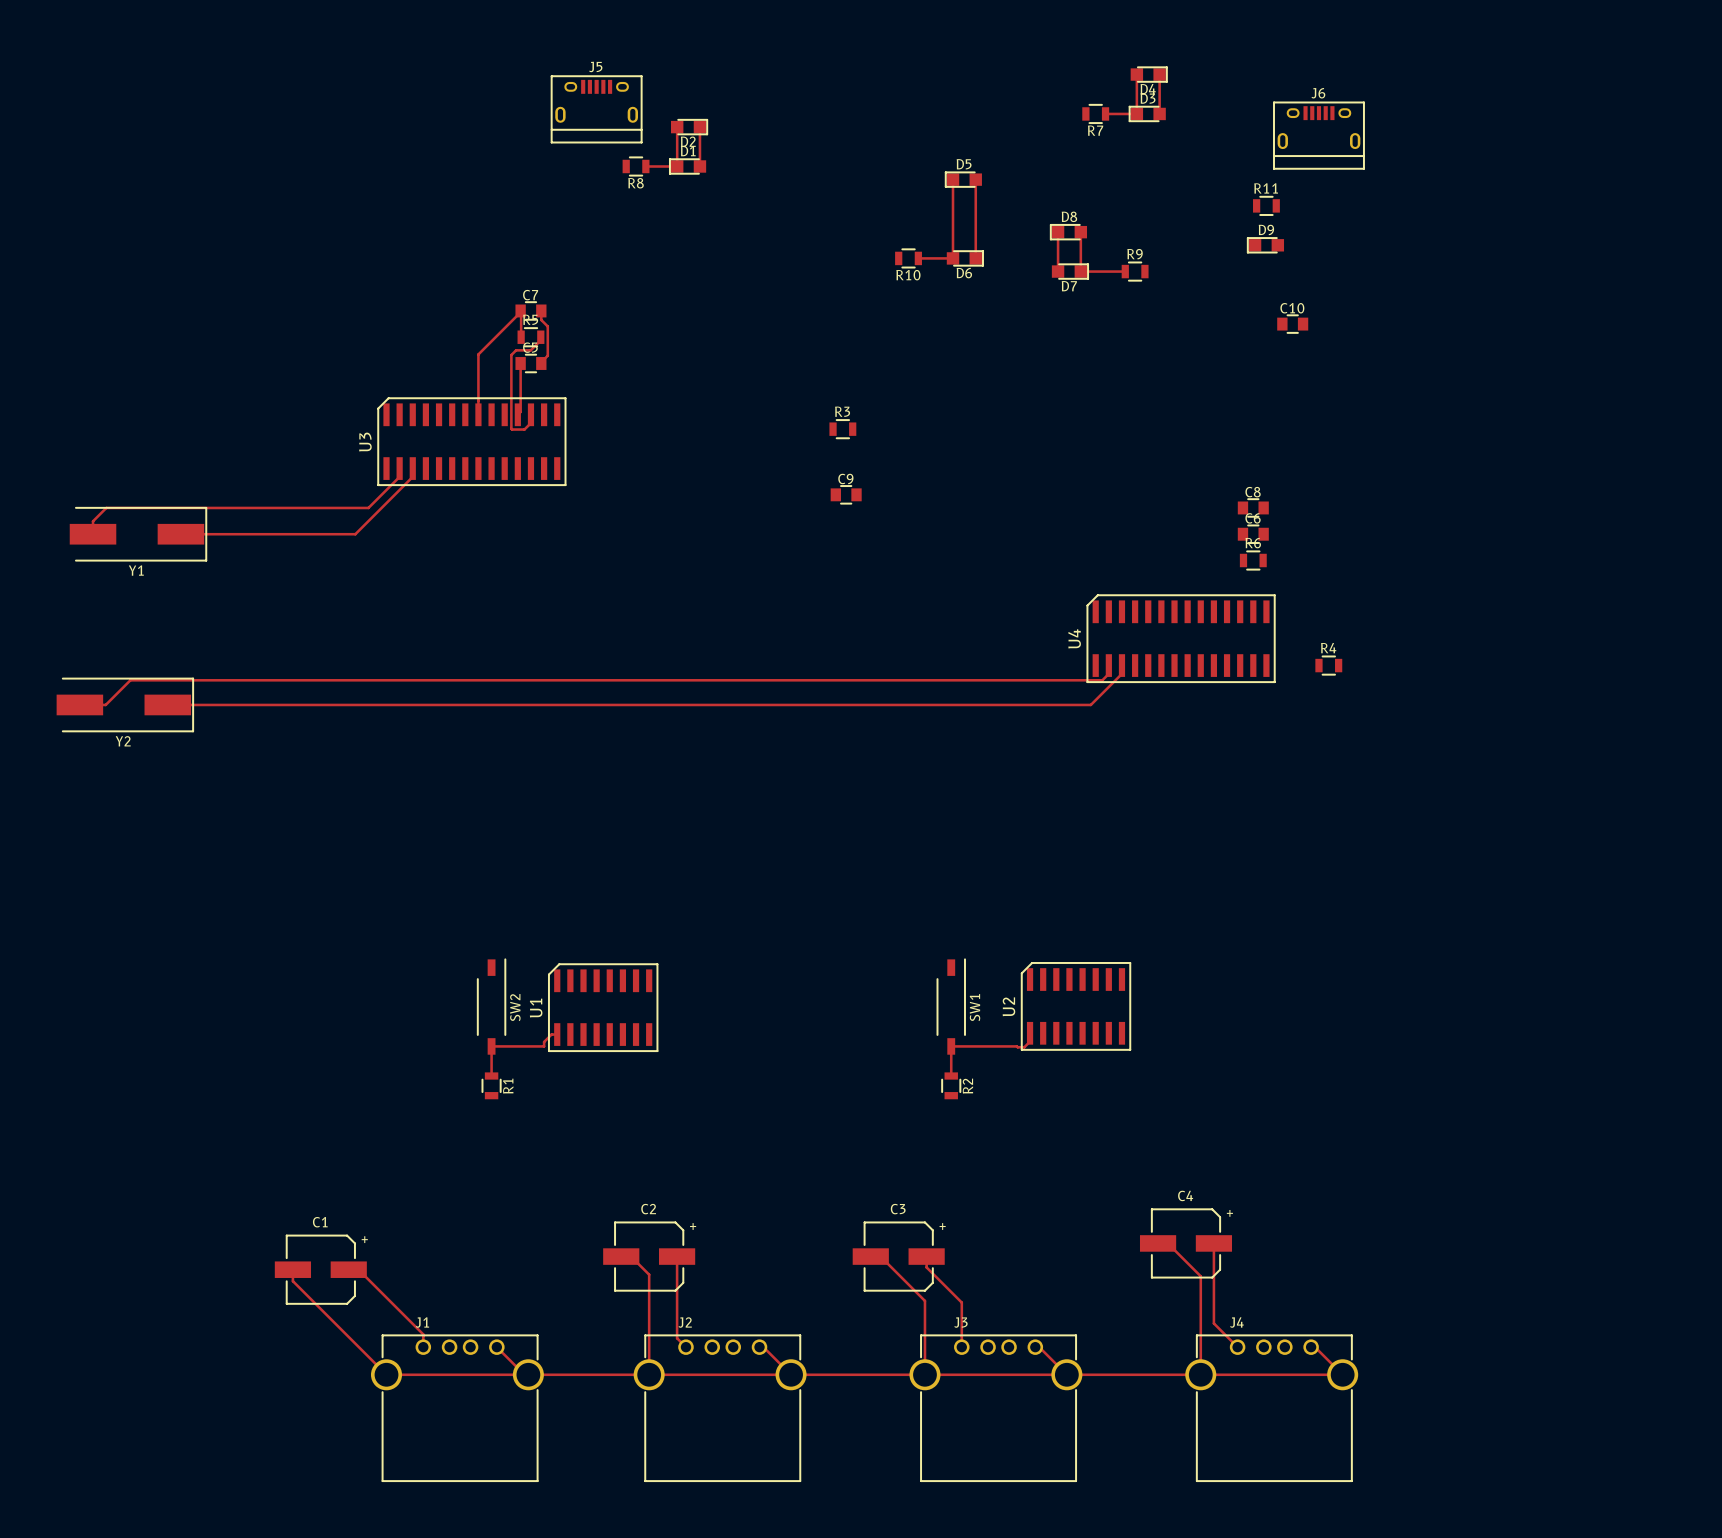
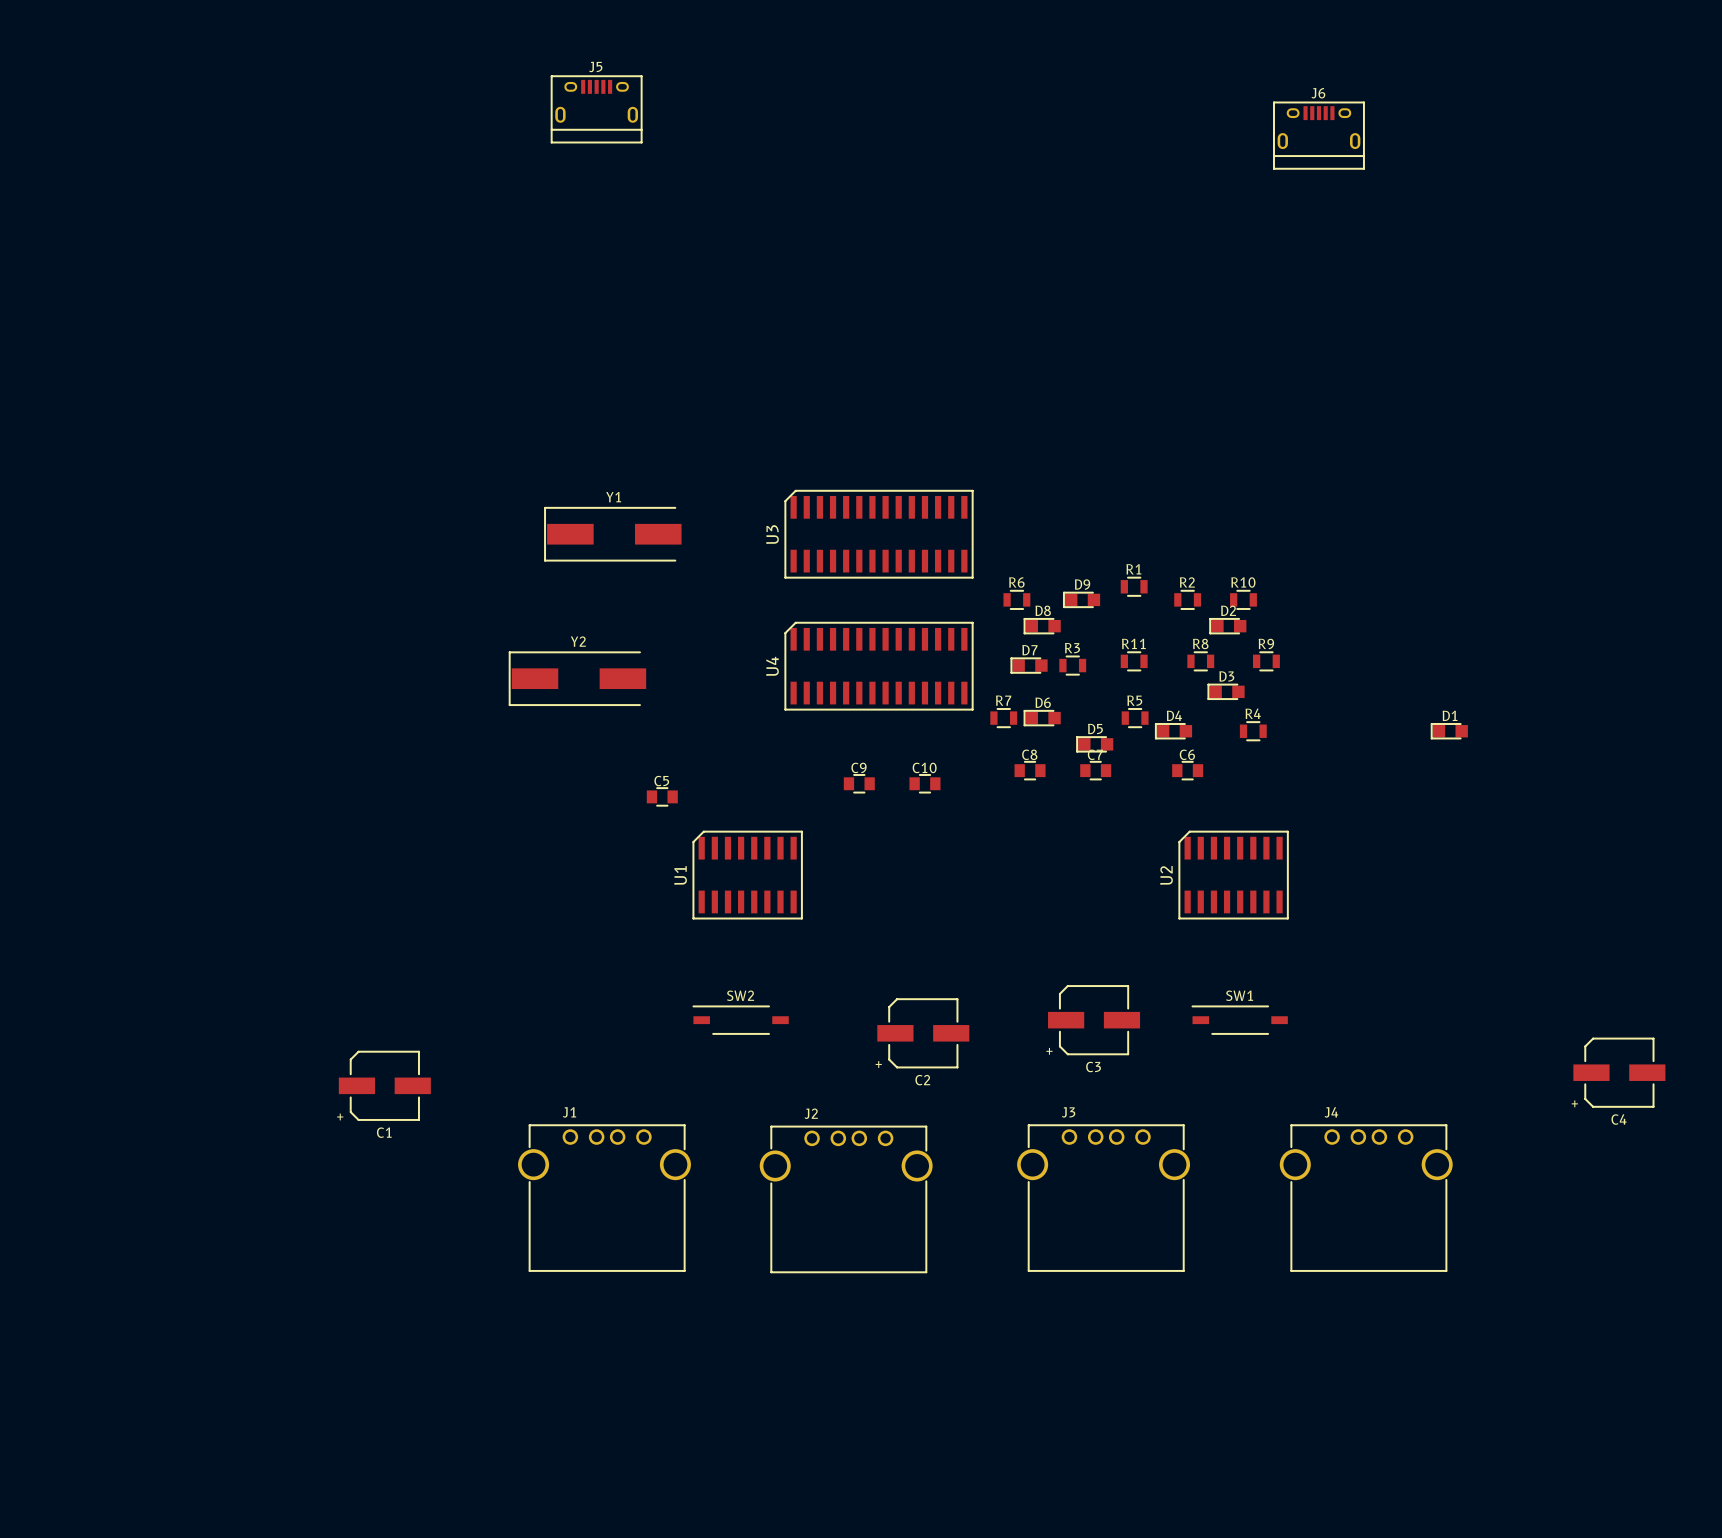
top track: (1136, 74) (1136, 113) (1105, 113) -> none
D4 rotation: 0° (1149, 74) -> 180° (1173, 731)
D4 position: (1149, 74) -> (1173, 731)
top track: (1159, 74) (1159, 113) -> none
R7 position: (1095, 113) -> (1003, 718)
D3 position: (1147, 113) -> (1226, 691)
top track: (677, 127) (677, 166) (645, 166) -> none
D2 rotation: 0° (689, 127) -> 180° (1227, 626)
D2 position: (689, 127) -> (1227, 626)
top track: (699, 127) (699, 166) -> none
R7 name position: R7 (1095, 130) -> R7 (1003, 700)
R8 position: (636, 166) -> (1200, 661)
D1 position: (687, 166) -> (1449, 731)
top track: (953, 179) (953, 258) (918, 258) -> none
D5 position: (963, 179) -> (1094, 744)
top track: (975, 179) (975, 258) -> none
R8 name position: R8 (635, 183) -> R8 (1200, 643)
R11 position: (1266, 205) -> (1134, 661)
top track: (1058, 232) (1058, 271) -> none
D8 position: (1068, 232) -> (1042, 626)
top track: (1080, 232) (1080, 271) (1125, 271) -> none
D9 position: (1265, 245) -> (1081, 599)
R10 position: (908, 258) -> (1243, 599)
D6 rotation: 0° (965, 258) -> 180° (1042, 718)
D6 position: (965, 258) -> (1042, 718)
D7 rotation: 0° (1070, 271) -> 180° (1029, 665)
D7 position: (1070, 271) -> (1029, 665)
R9 position: (1135, 271) -> (1266, 661)
R10 name position: R10 (908, 275) -> R10 (1243, 582)
C7 position: (530, 310) -> (1095, 770)
top track: (541, 310) (541, 320) (547, 326) (547, 355) (541, 363) -> none
C10 position: (1292, 324) -> (924, 783)
top track: (521, 337) (520, 310) (478, 354) (478, 414) -> none
R5 position: (530, 337) -> (1135, 718)
top track: (540, 337) (540, 340) (530, 350) (516, 350) (511, 355) (511, 428) (524, 429) (530, 423) (530, 414) -> none
top track: (520, 363) (520, 411) (517, 414) -> none
C5 position: (530, 363) -> (662, 796)
R3 position: (842, 429) -> (1072, 665)
U3 position: (471, 441) -> (879, 534)
top track: (399, 468) (399, 476) (368, 507) (106, 507) (93, 521) (93, 534) -> none
top track: (412, 468) (412, 476) (355, 534) (180, 534) -> none
C9 position: (846, 494) -> (859, 783)
C8 position: (1253, 507) -> (1030, 770)
Y1 rotation: 0° (138, 534) -> 180° (612, 534)
Y1 position: (138, 534) -> (612, 534)
C6 position: (1253, 534) -> (1187, 770)
R6 position: (1253, 560) -> (1016, 599)
U4 position: (1181, 638) -> (879, 666)
top track: (1108, 665) (1108, 673) (1102, 680) (130, 680) (105, 704) (79, 704) -> none
top track: (1121, 665) (1121, 673) (1090, 704) (167, 704) -> none
R4 position: (1328, 665) -> (1253, 731)
Y2 rotation: 0° (125, 704) -> 180° (577, 678)
Y2 position: (125, 704) -> (577, 678)
SW2 rotation: 0° (491, 1006) -> 90° counterclockwise (740, 1020)
SW2 position: (491, 1006) -> (740, 1020)
SW1 rotation: 0° (951, 1006) -> 90° counterclockwise (1239, 1020)
SW1 position: (951, 1006) -> (1239, 1020)
U2 position: (1076, 1006) -> (1233, 875)
U1 position: (603, 1007) -> (747, 875)
top track: (1030, 1033) (1030, 1041) (1024, 1047) (951, 1046) (951, 1076) -> none
top track: (557, 1034) (551, 1034) (544, 1041) (544, 1046) (491, 1046) (491, 1076) -> none
R1 rotation: 0° (491, 1085) -> 90° clockwise (1134, 586)
R1 position: (491, 1085) -> (1134, 586)
R2 rotation: 0° (951, 1085) -> 90° clockwise (1187, 599)
R2 position: (951, 1085) -> (1187, 599)
R1 name position: R1 (508, 1086) -> R1 (1133, 569)
R2 name position: R2 (967, 1086) -> R2 (1187, 582)
top track: (1158, 1243) (1167, 1243) (1200, 1276) (1200, 1374) -> none
C4 rotation: 0° (1185, 1243) -> 180° (1619, 1072)
C4 position: (1185, 1243) -> (1619, 1072)
top track: (1213, 1243) (1213, 1323) (1237, 1347) -> none
top track: (621, 1256) (631, 1256) (649, 1274) (649, 1374) -> none
C2 rotation: 0° (649, 1256) -> 180° (923, 1033)
C2 position: (649, 1256) -> (923, 1033)
top track: (677, 1256) (677, 1338) (685, 1347) -> none
top track: (870, 1256) (880, 1256) (924, 1300) (924, 1374) -> none
C3 rotation: 0° (898, 1256) -> 180° (1094, 1020)
C3 position: (898, 1256) -> (1094, 1020)
top track: (926, 1256) (926, 1267) (961, 1302) (961, 1347) -> none
top track: (292, 1269) (292, 1281) (386, 1374) (1342, 1374) (1315, 1347) (1311, 1347) -> none
C1 rotation: 0° (320, 1269) -> 180° (384, 1085)
C1 position: (320, 1269) -> (384, 1085)
top track: (348, 1269) (358, 1269) (423, 1334) (423, 1347) -> none
top track: (496, 1347) (524, 1374) -> none
top track: (759, 1347) (763, 1347) (791, 1374) -> none
top track: (1035, 1347) (1039, 1347) (1066, 1374) -> none
J1 position: (457, 1408) -> (604, 1198)
J2 position: (720, 1408) -> (846, 1199)
J3 position: (995, 1408) -> (1103, 1198)
J4 position: (1271, 1408) -> (1366, 1198)

